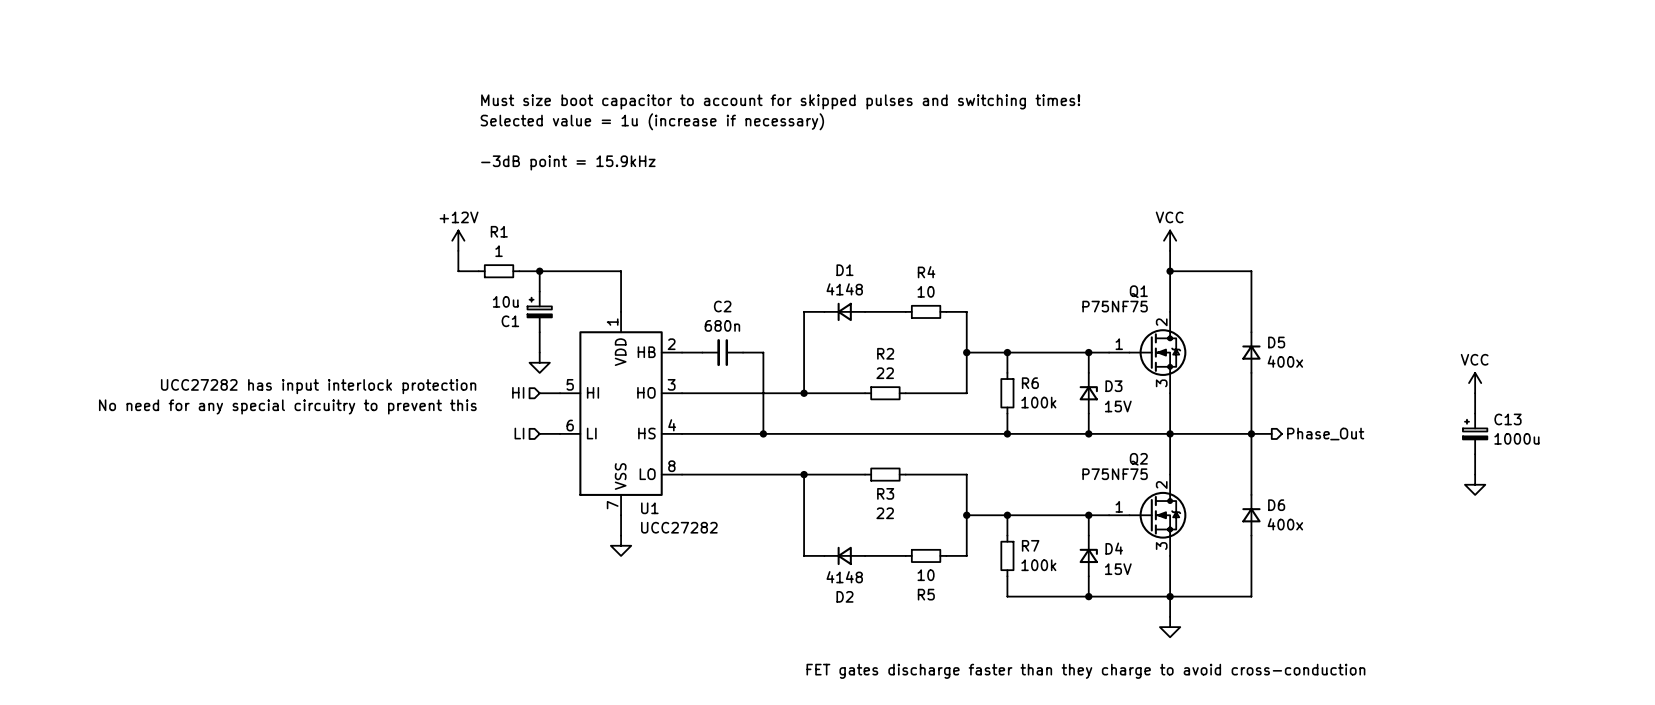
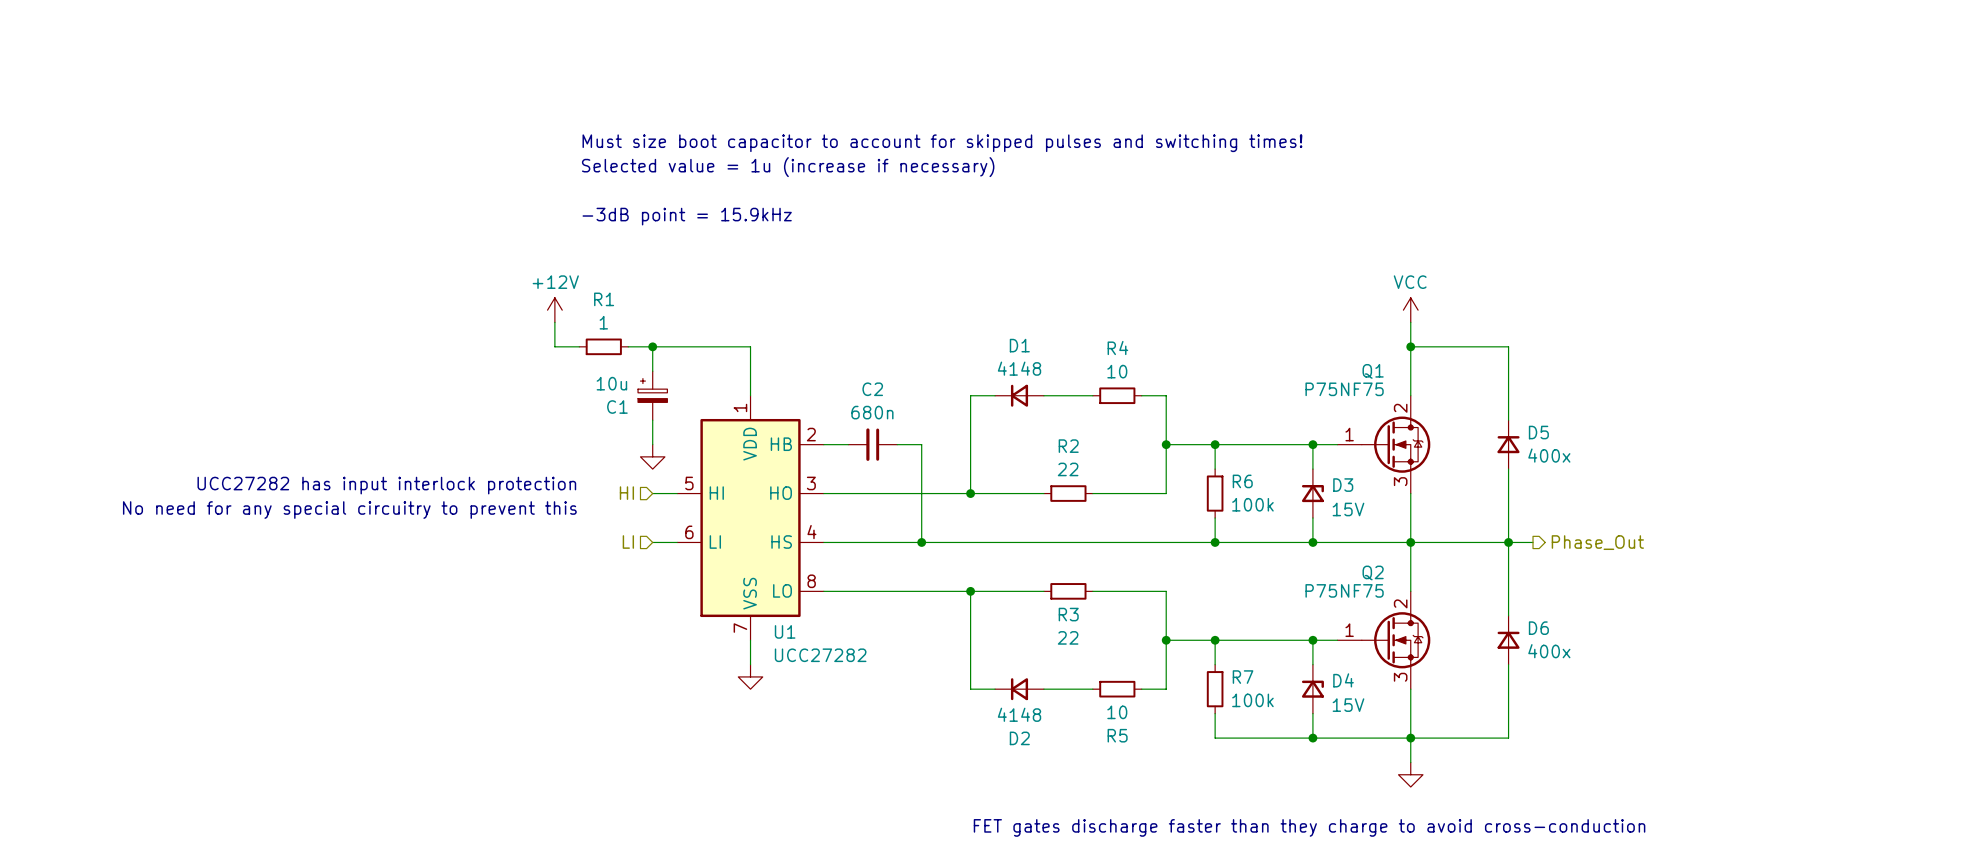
power symbol: VCC (1475, 383) -> none
wire: (1475, 393) (1475, 413) -> none
C13: 1000u (1475, 433) -> none
wire: (1475, 454) (1475, 474) -> none
power symbol: (1475, 484) -> none

